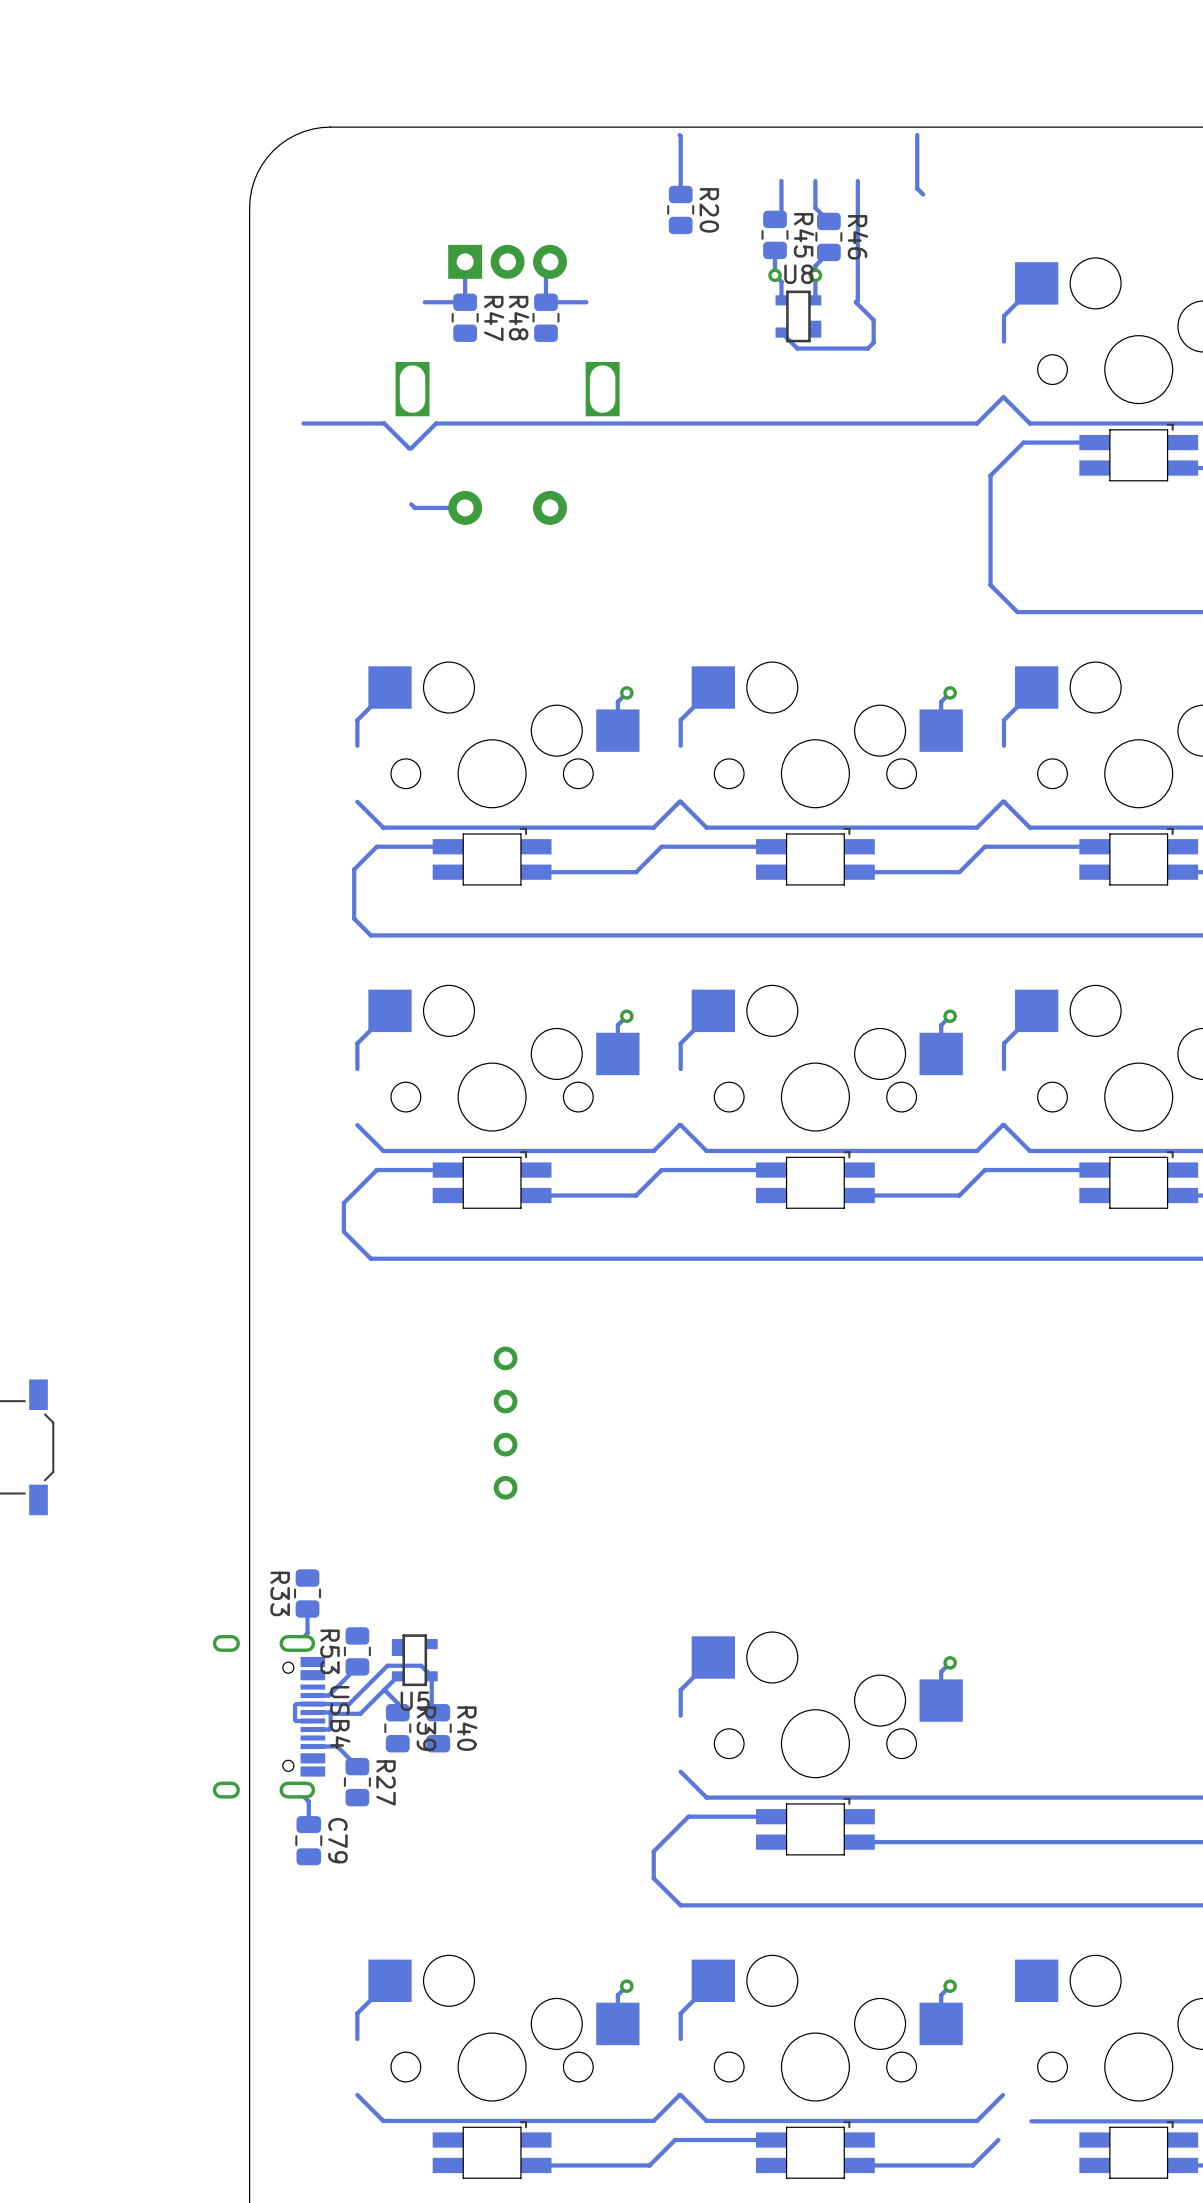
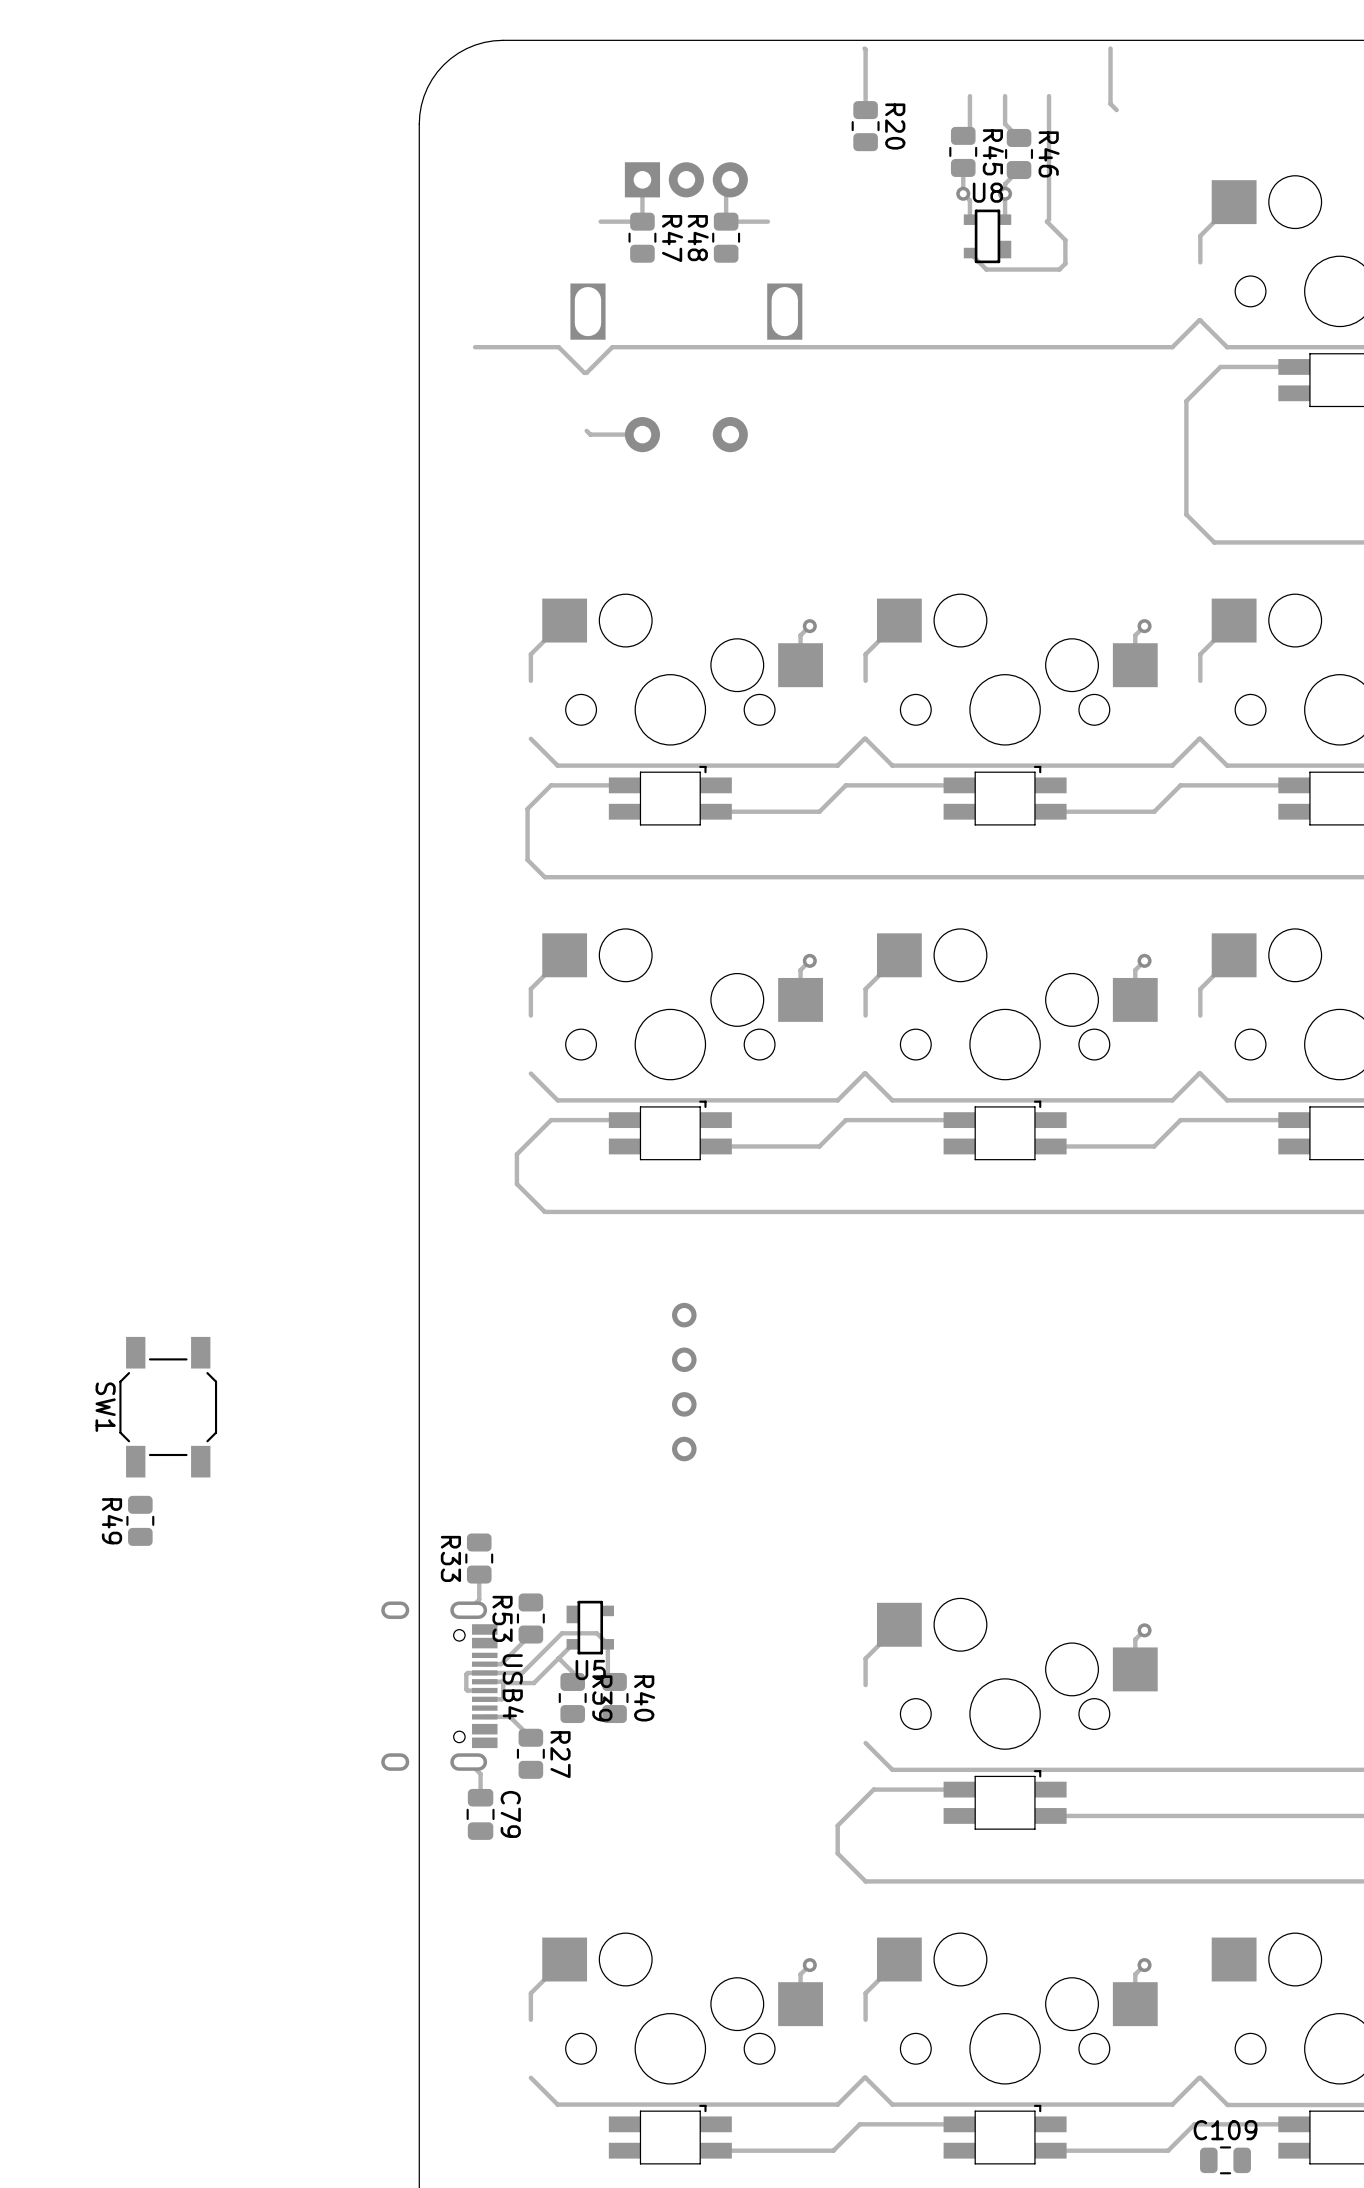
track: none -> (1200, 2077) (1228, 2105)
track: none -> (1294, 2124) (1194, 2124)
C109: none -> (1225, 2160)

